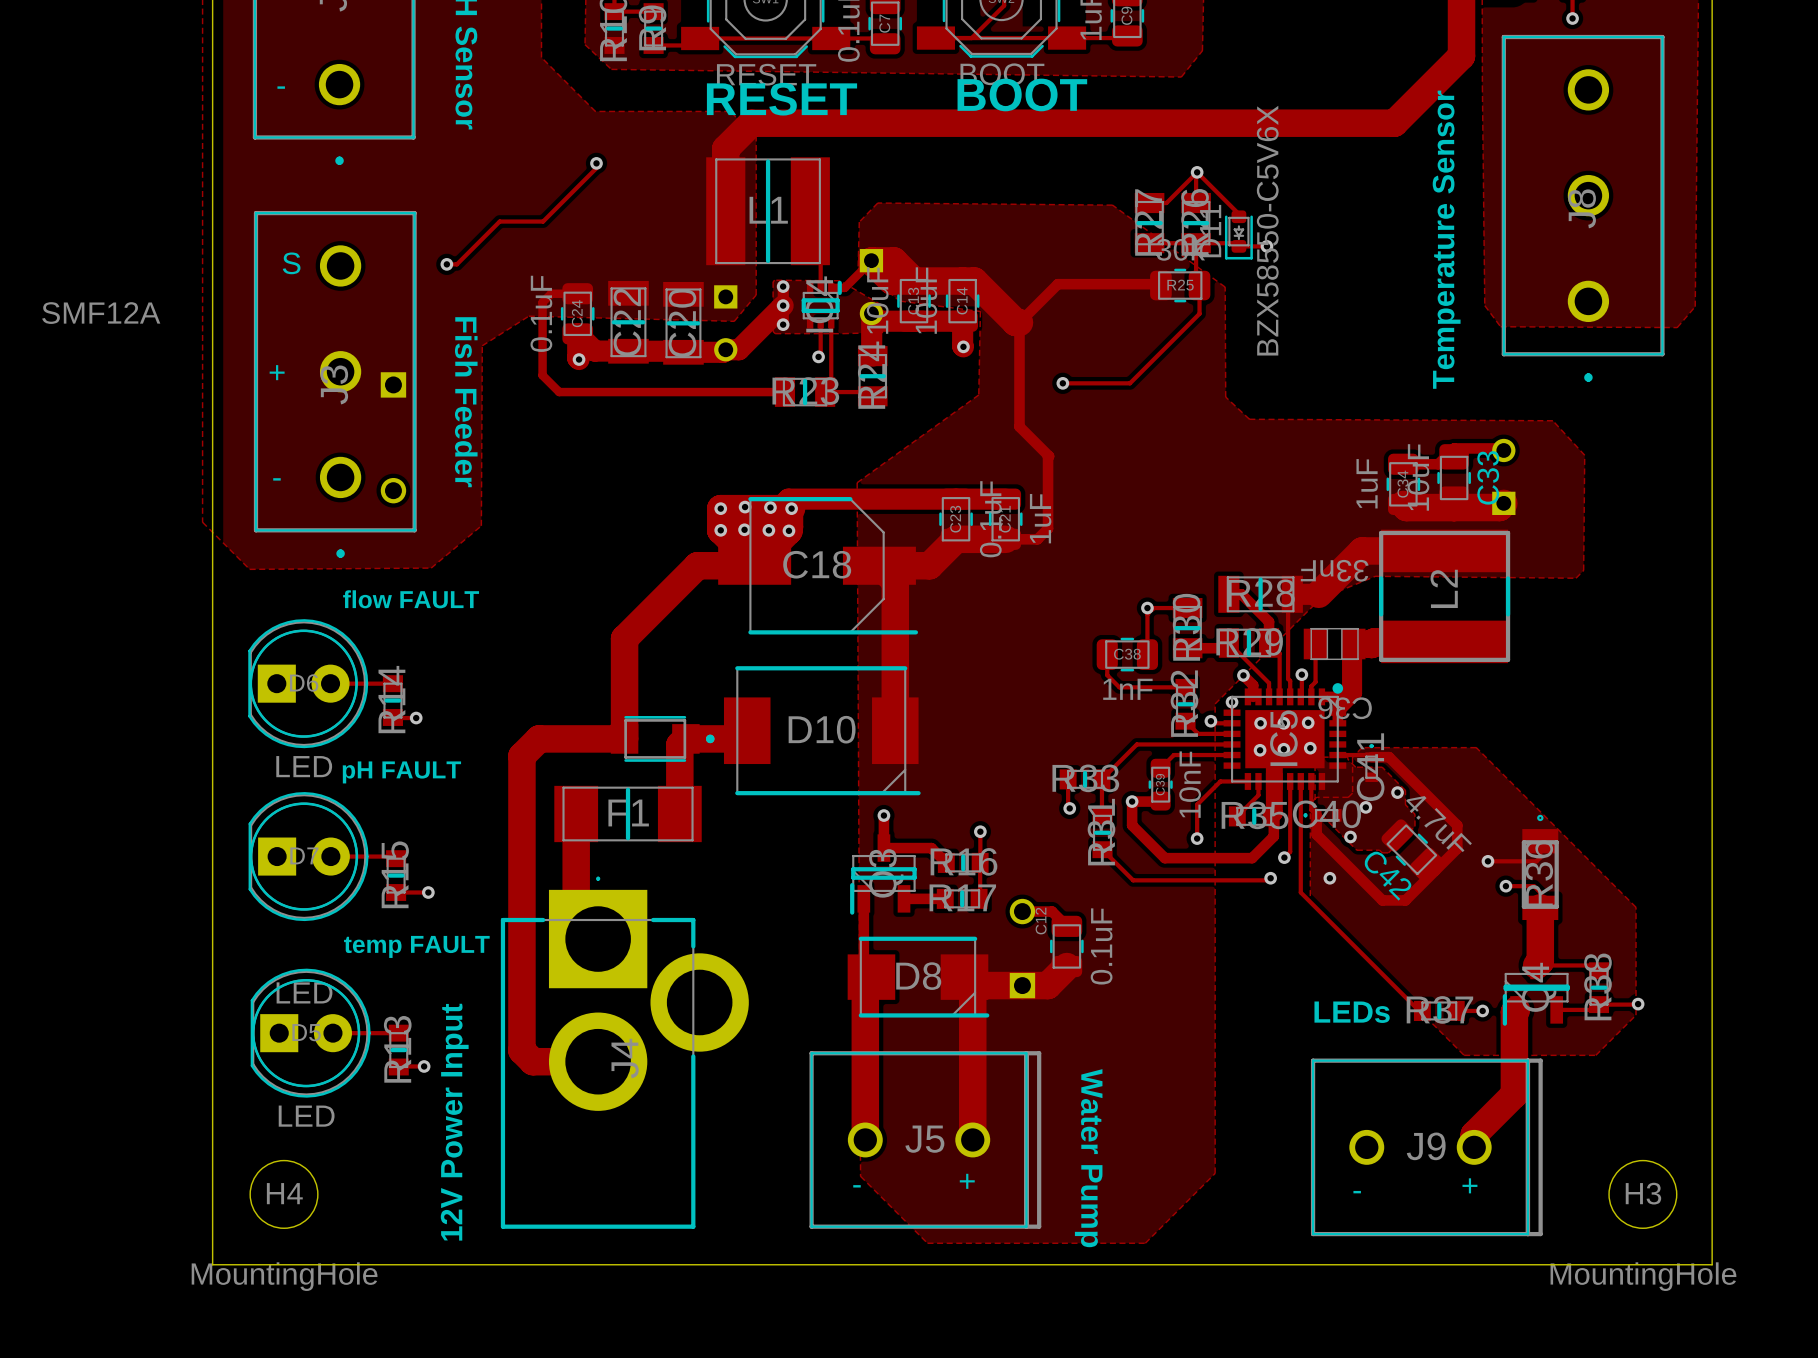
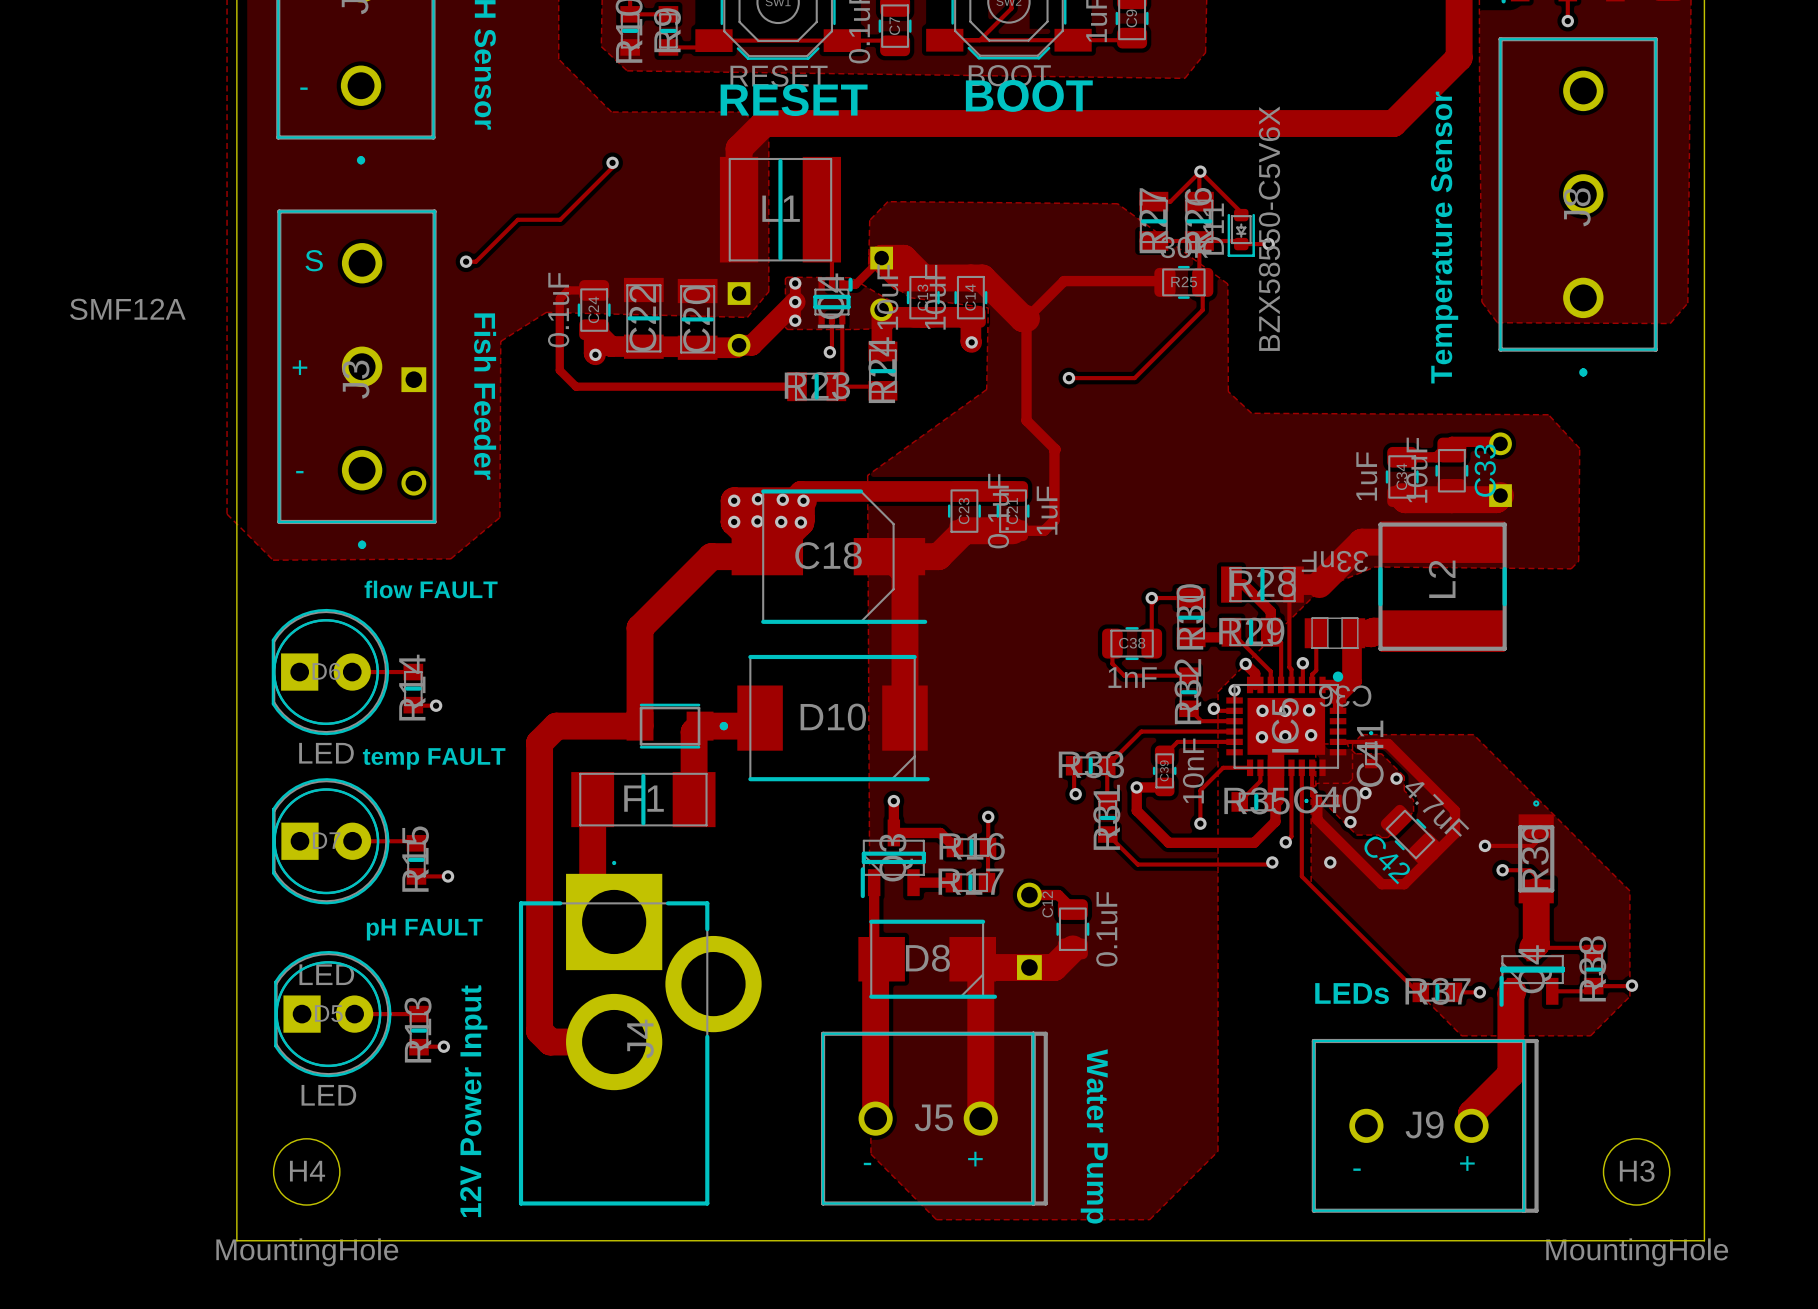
text: pH FAULT (401, 772) -> temp FAULT (434, 758)
text: temp FAULT (416, 946) -> pH FAULT (424, 929)

